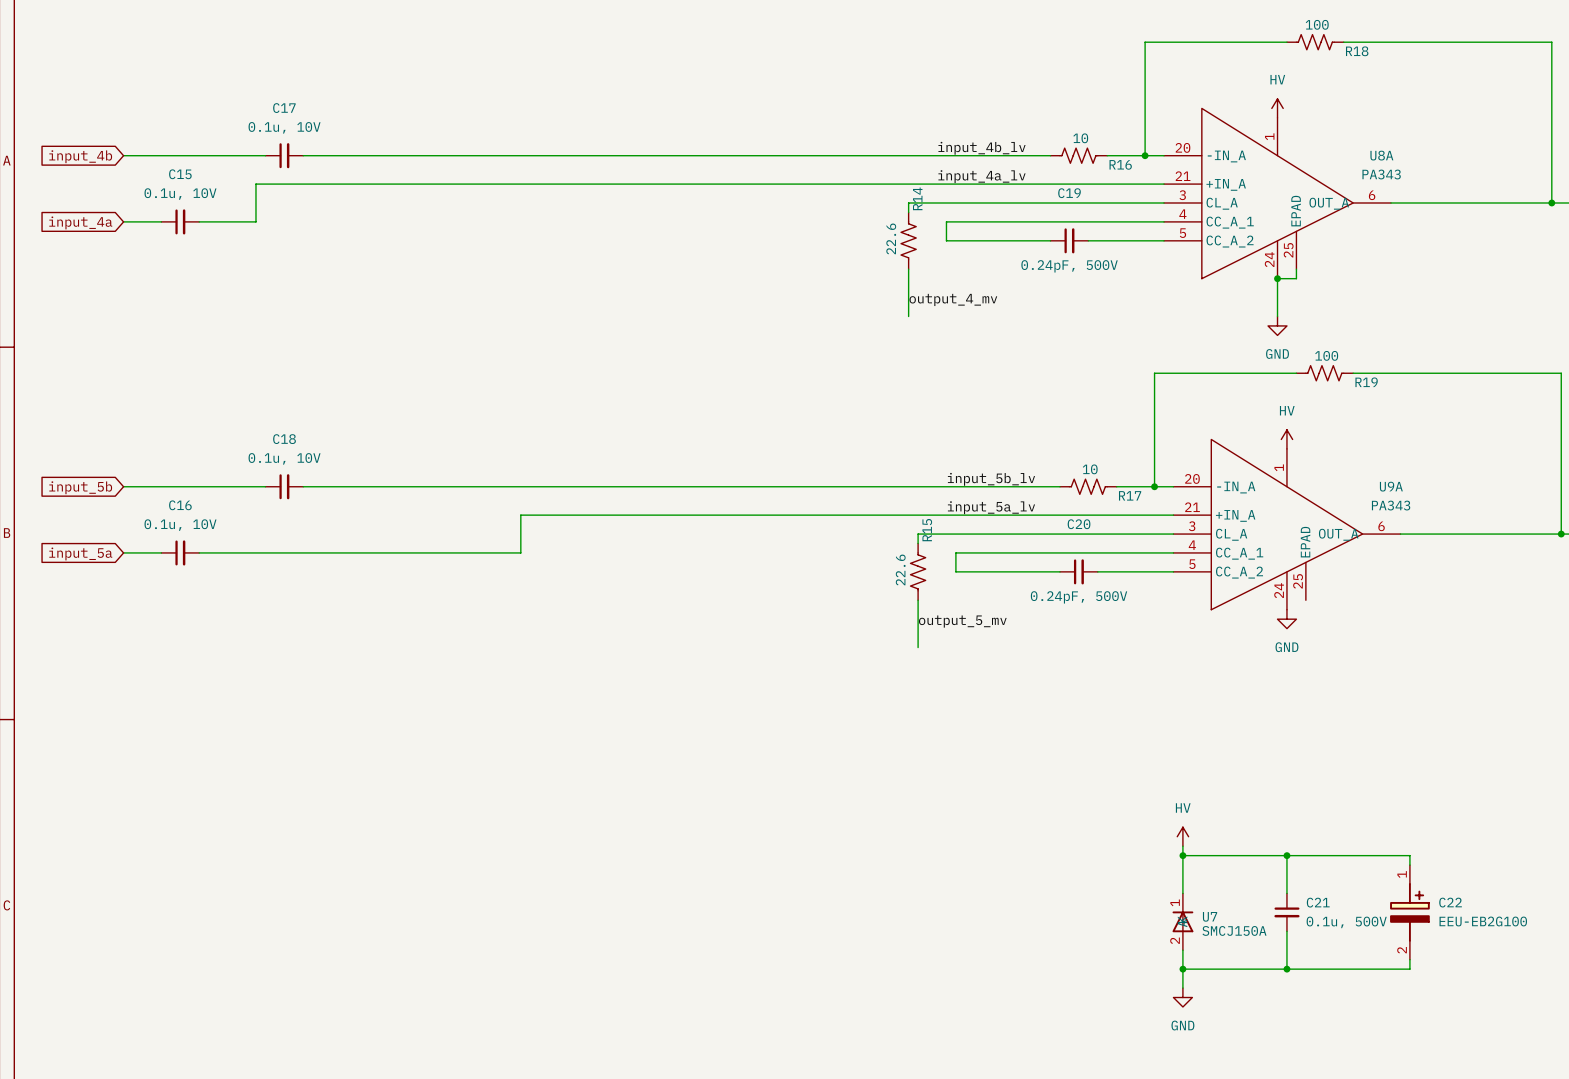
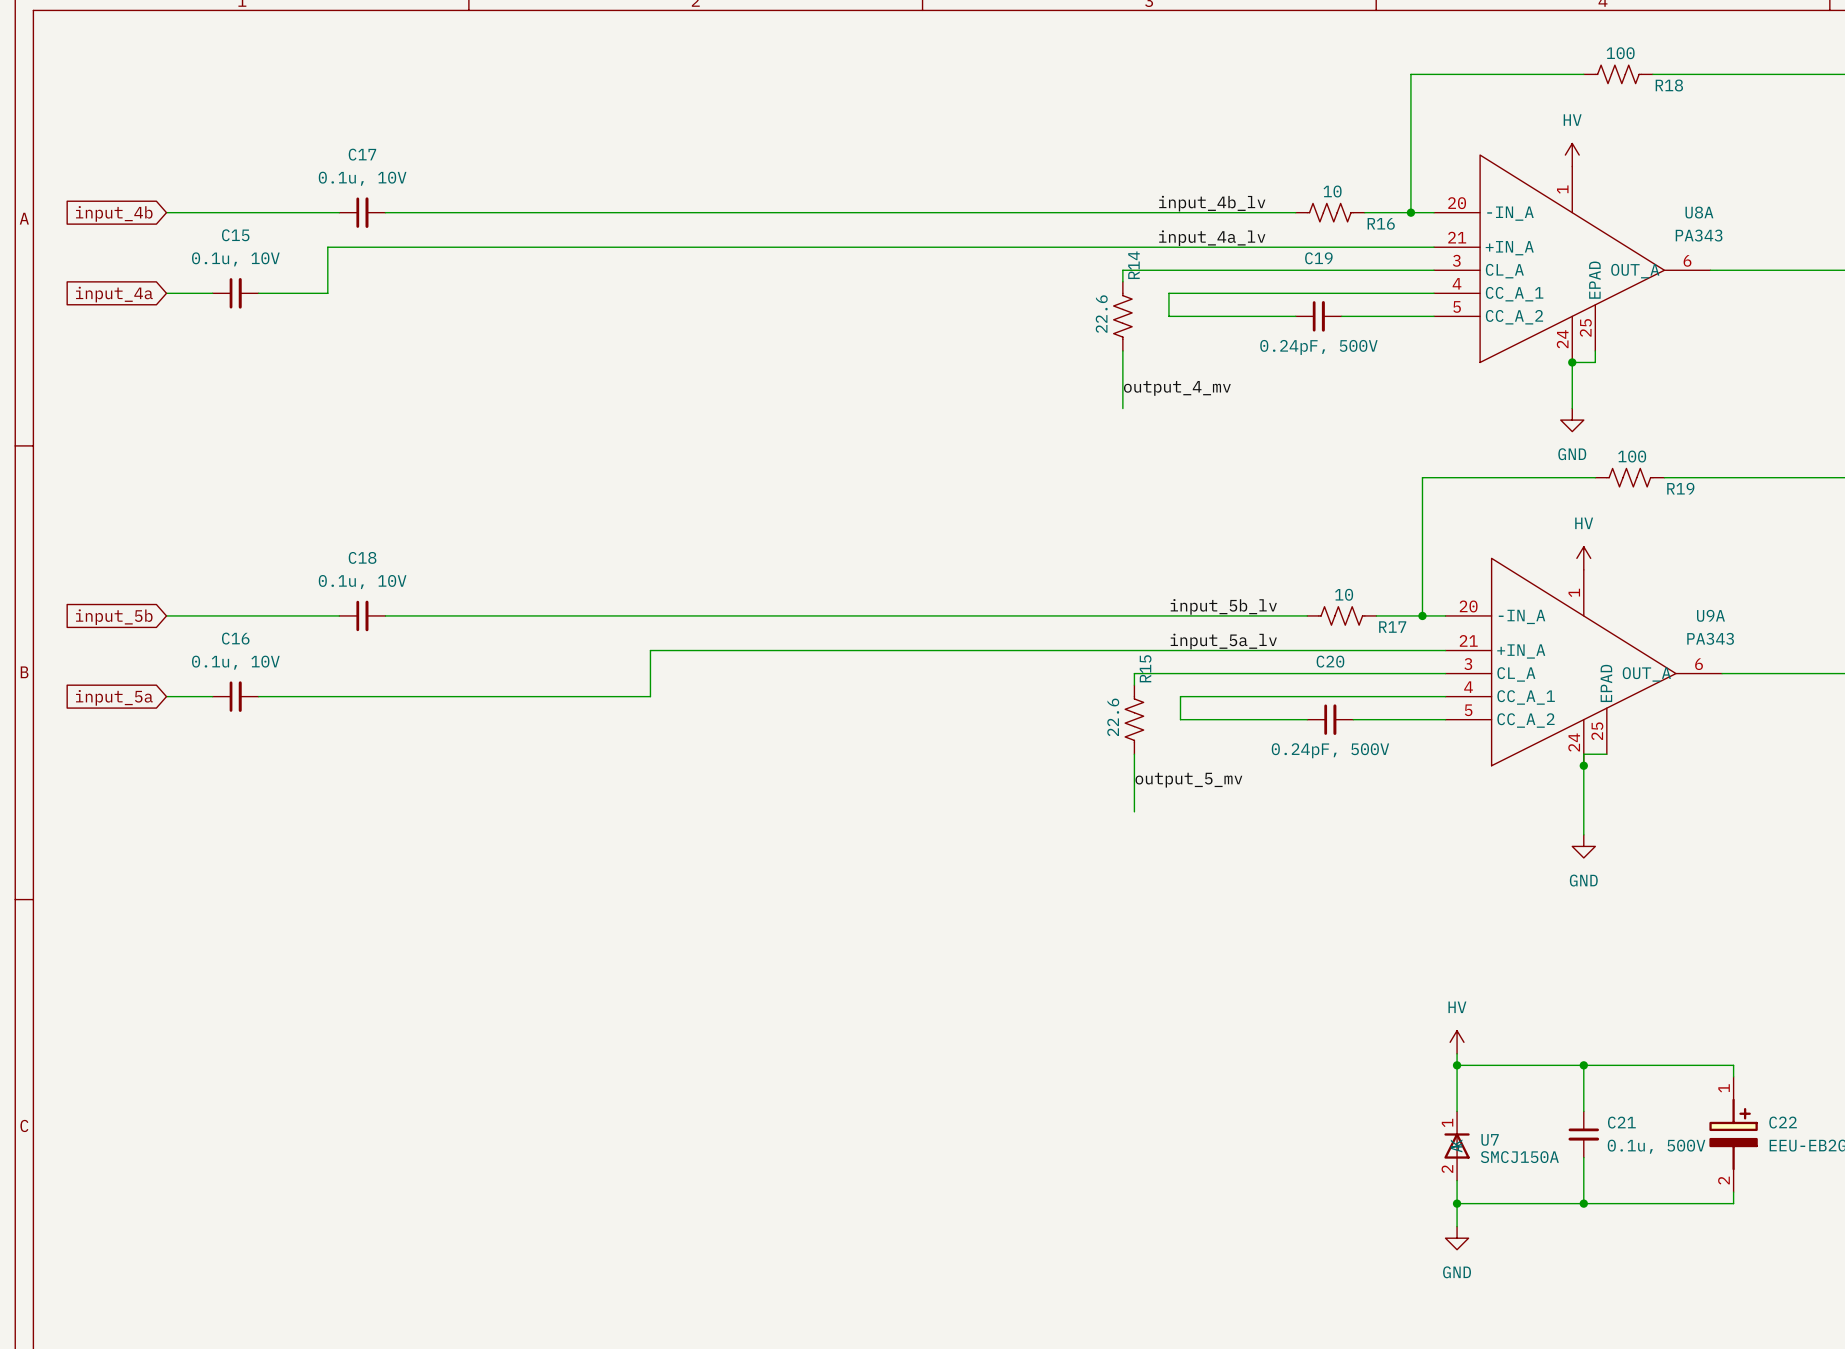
wire: none -> (1606, 754) (1583, 754) (1583, 834)
junction: none -> (1583, 765)
power symbol position: GND (1286, 619) -> GND (1583, 846)

